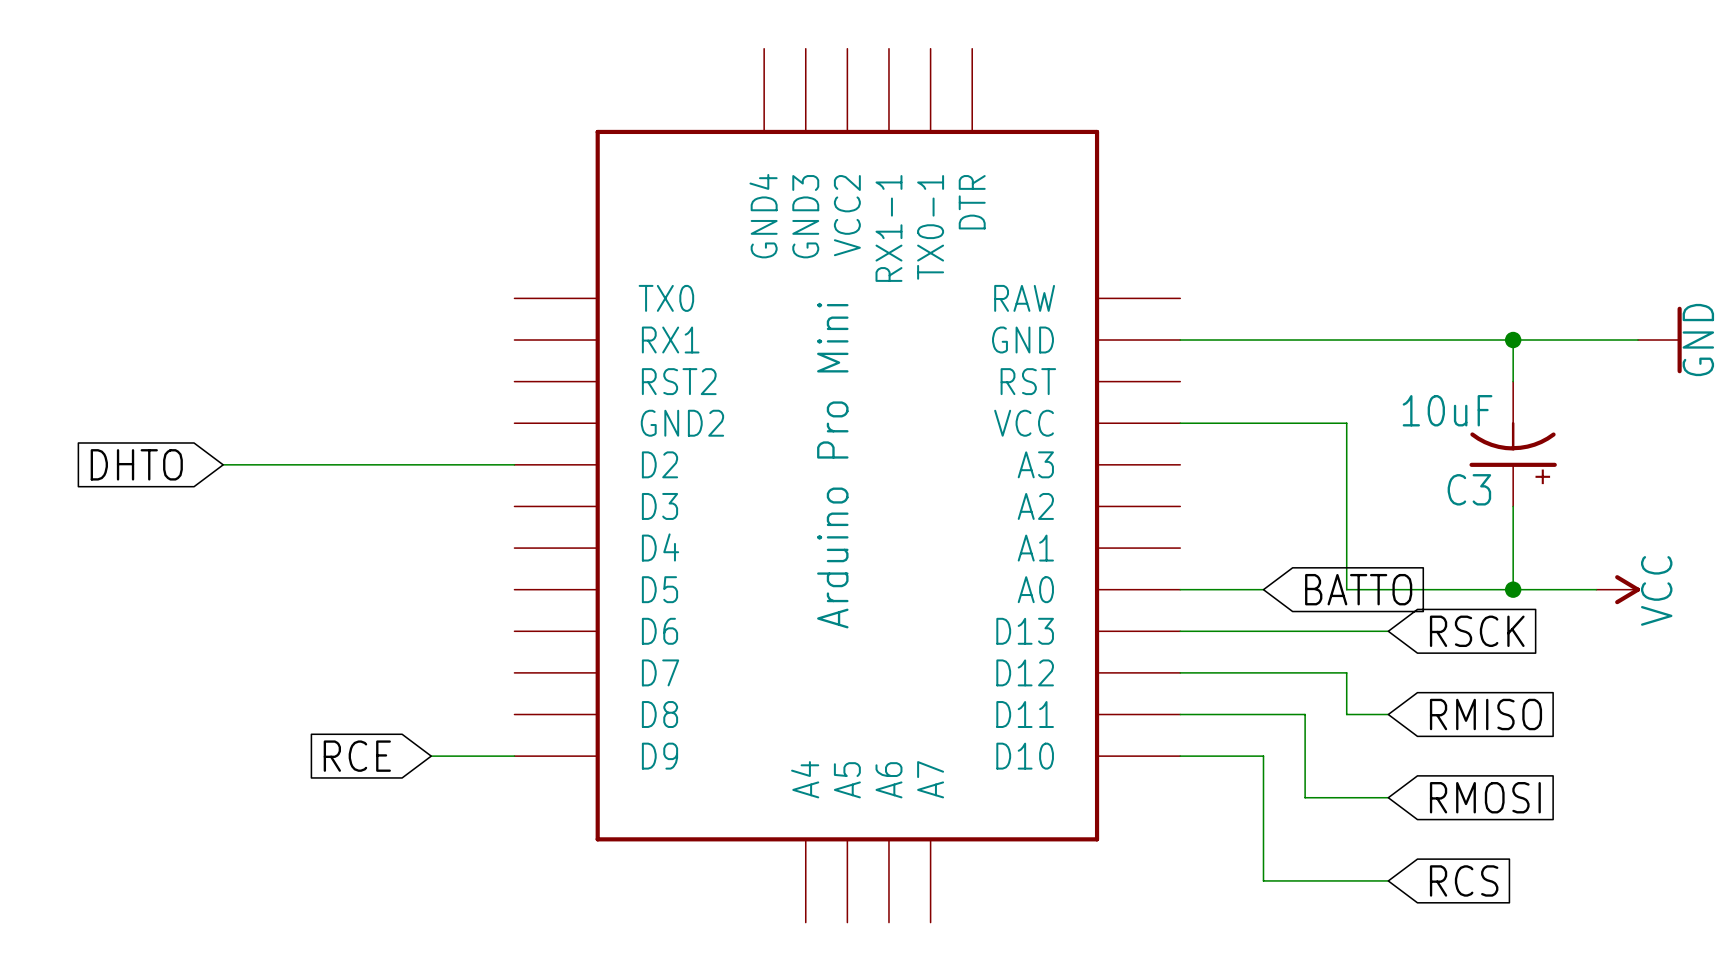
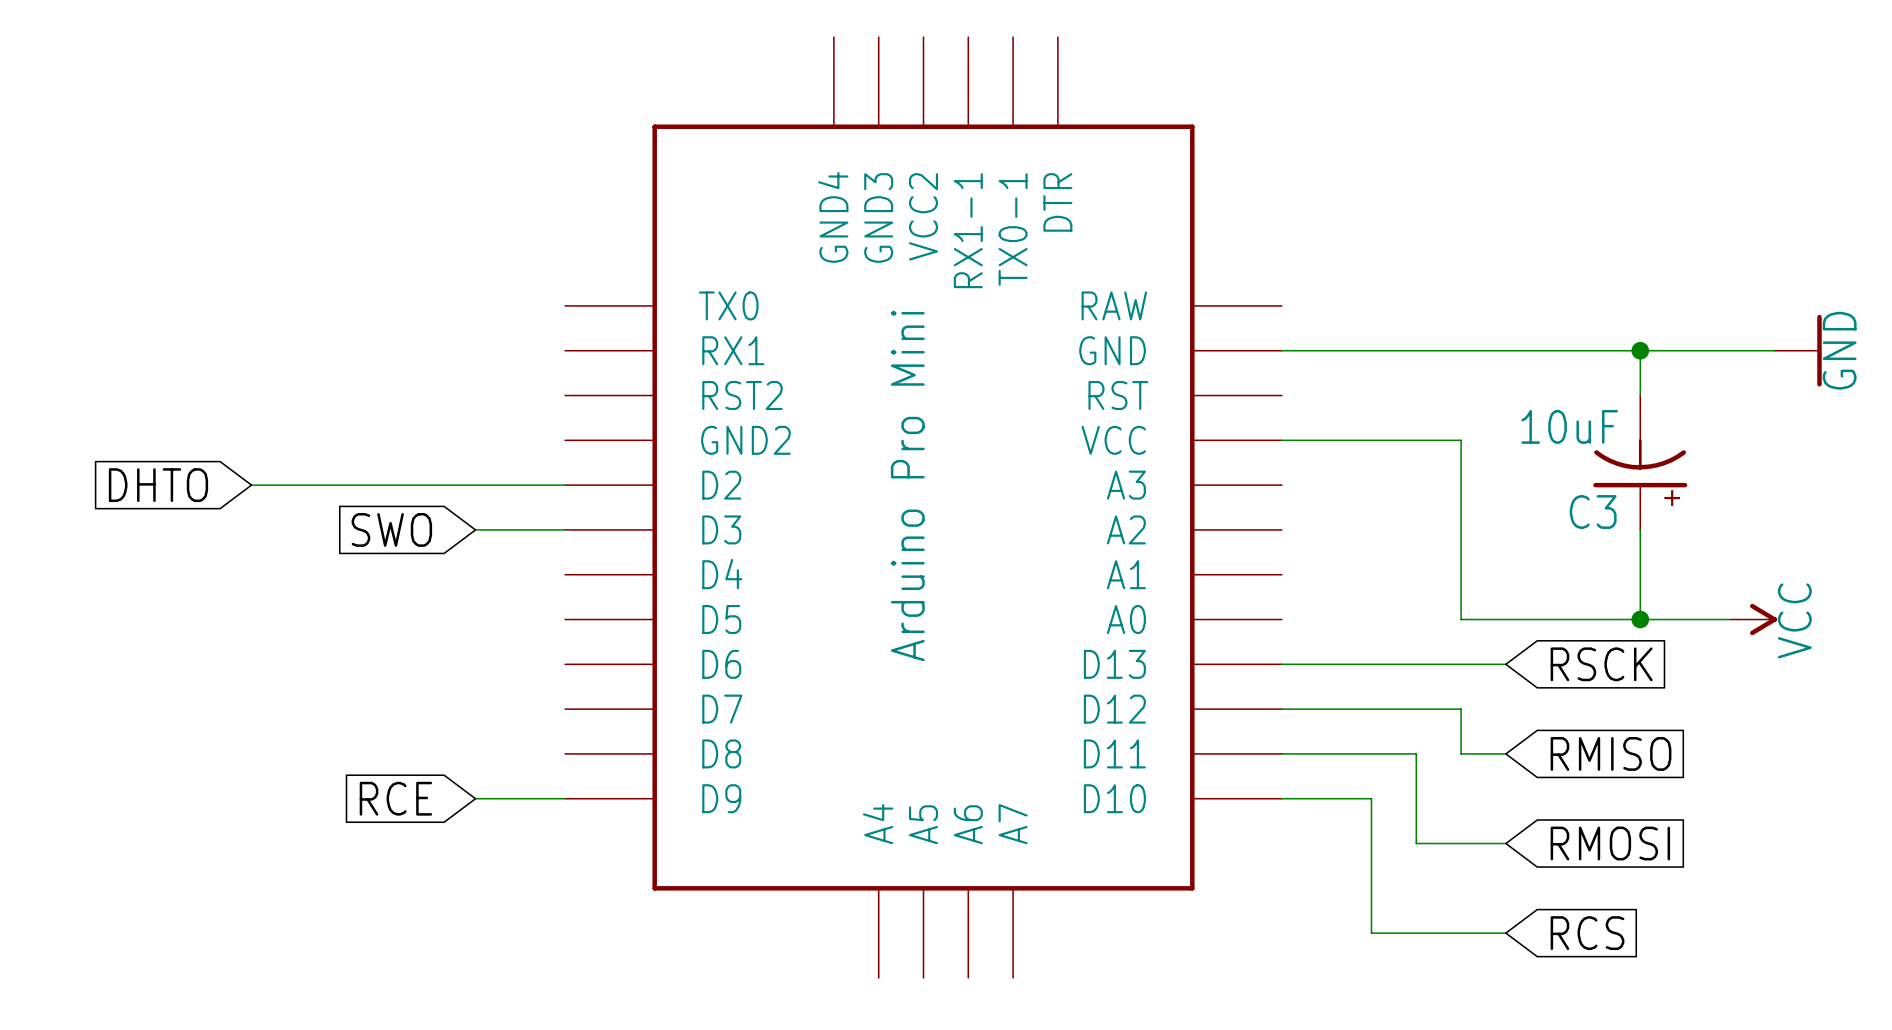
global label: none -> SWO (391, 529)
wire: none -> (475, 529) (565, 529)
wire: (1180, 589) (1263, 589) -> none
global label: BATTO (1358, 589) -> none

